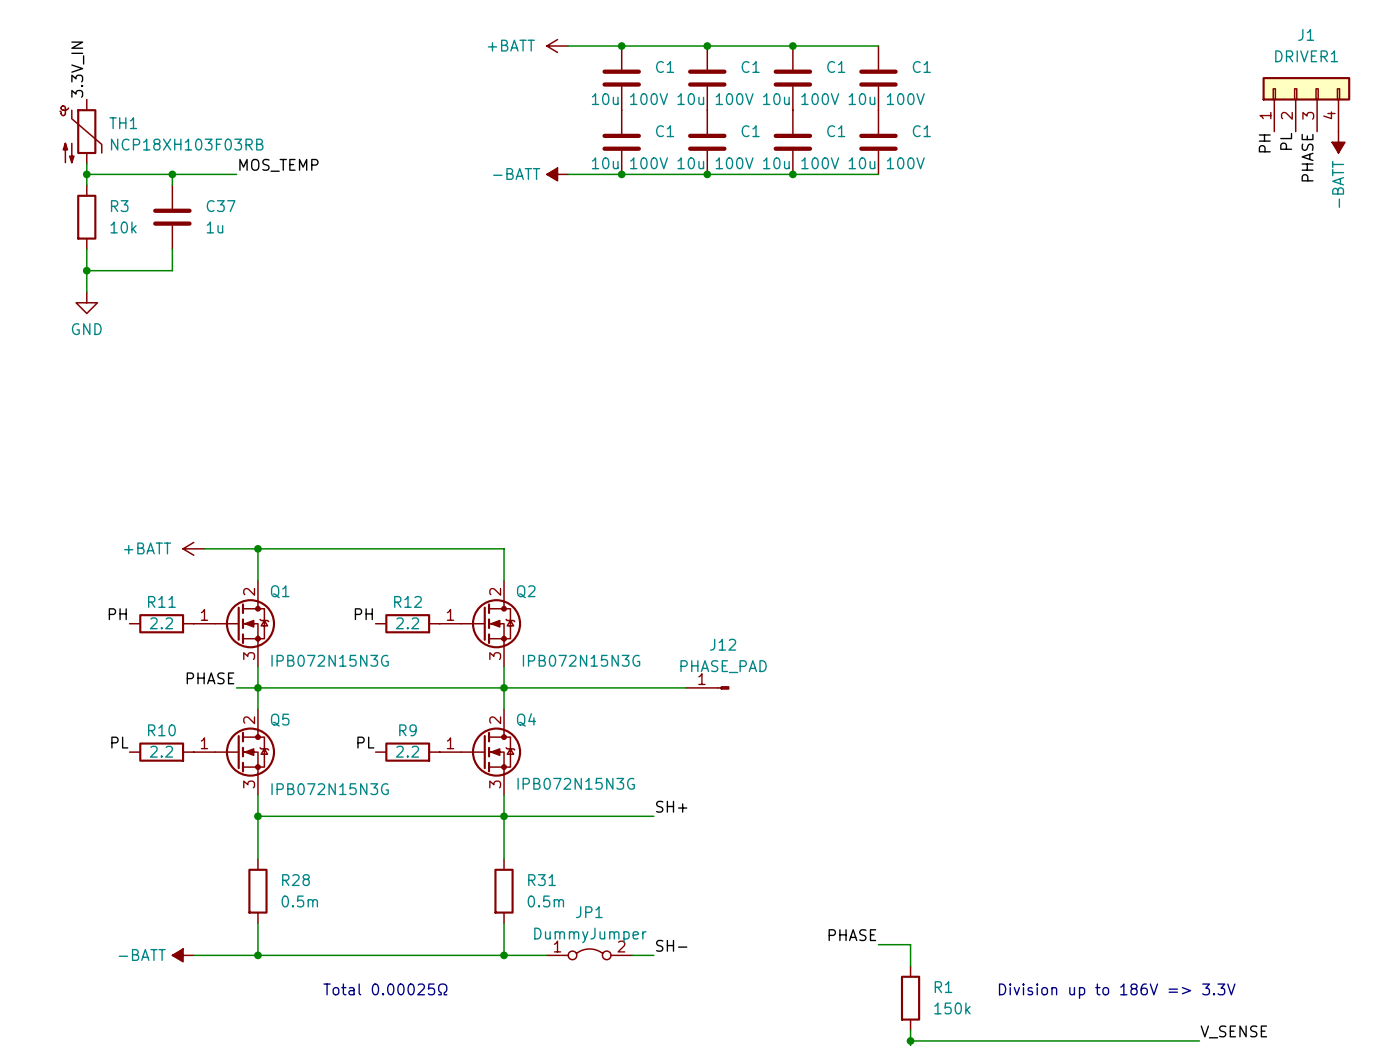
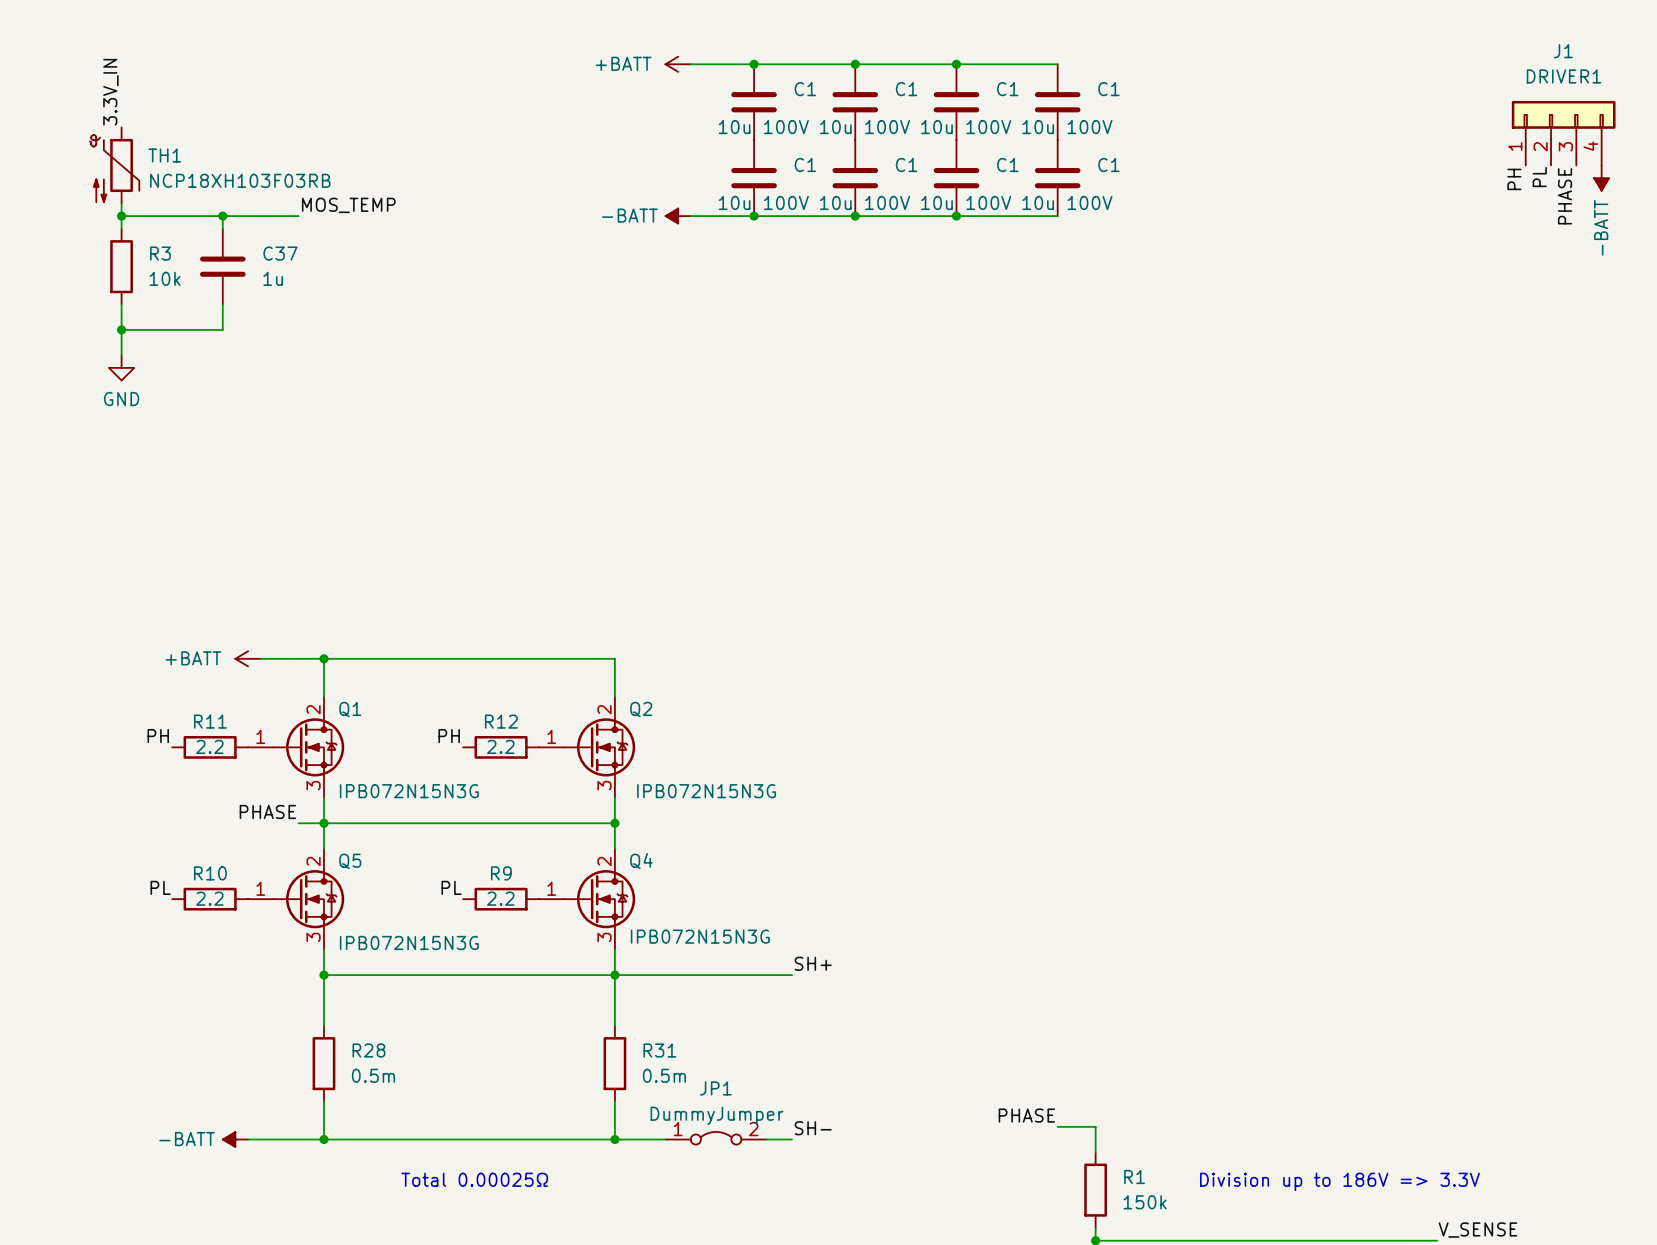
wire: (504, 687) (685, 687) -> none
J12: PHASE_PAD (707, 687) -> none

